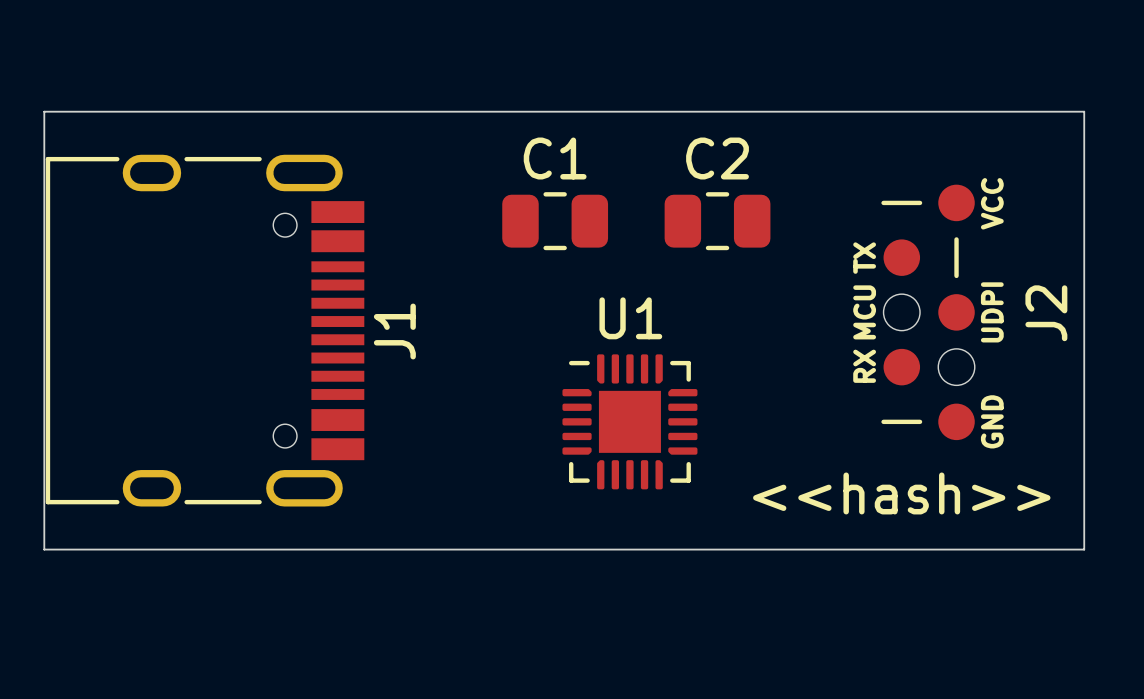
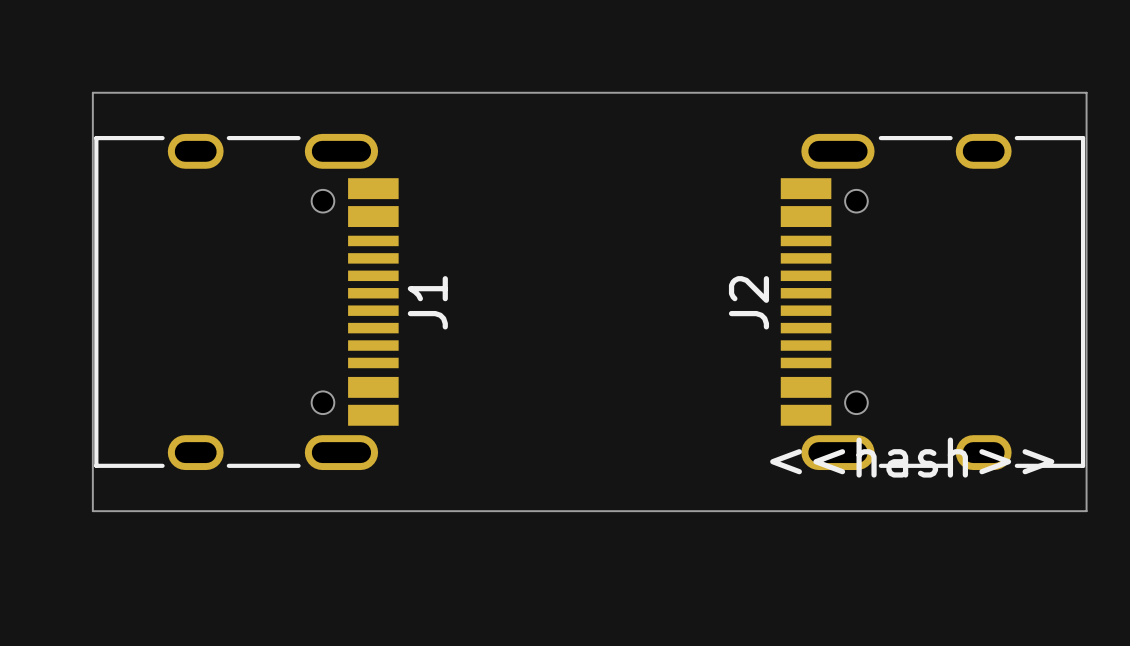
J2 footprint: [881, 184, 975, 441] -> [780, 133, 1086, 471]
C1: (555, 221) -> none
C2: (717, 221) -> none
J2 name position: J2 (1046, 313) -> J2 (748, 302)
U1: (629, 421) -> none

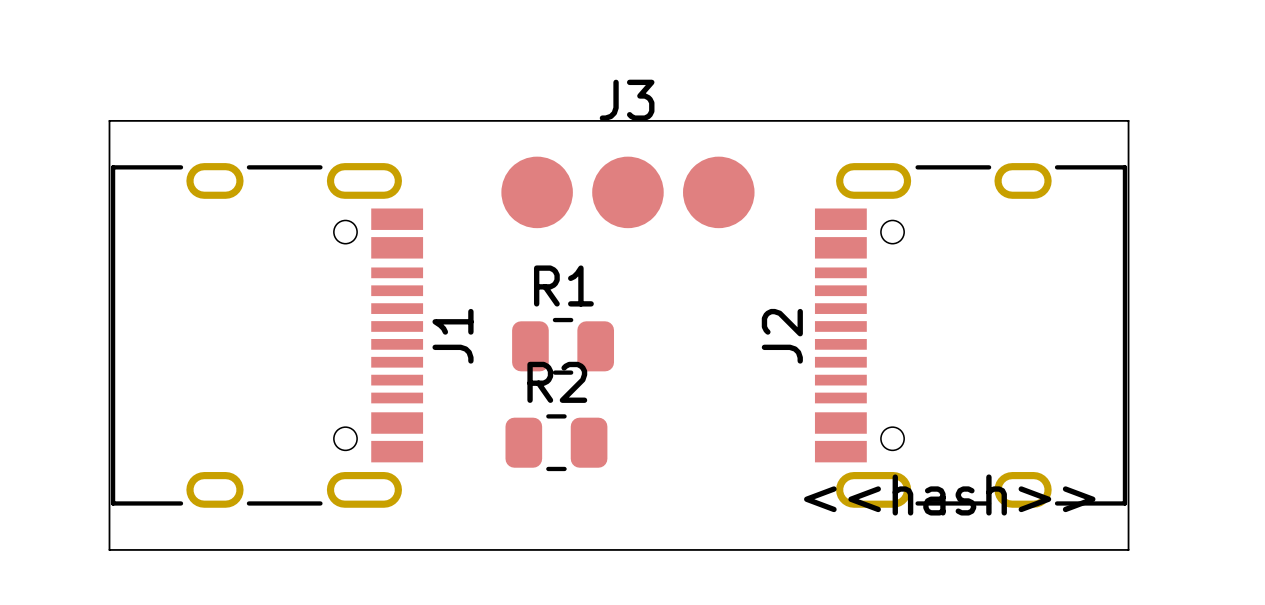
J3: none -> (627, 192)
R1: none -> (563, 346)
R2: none -> (556, 442)

